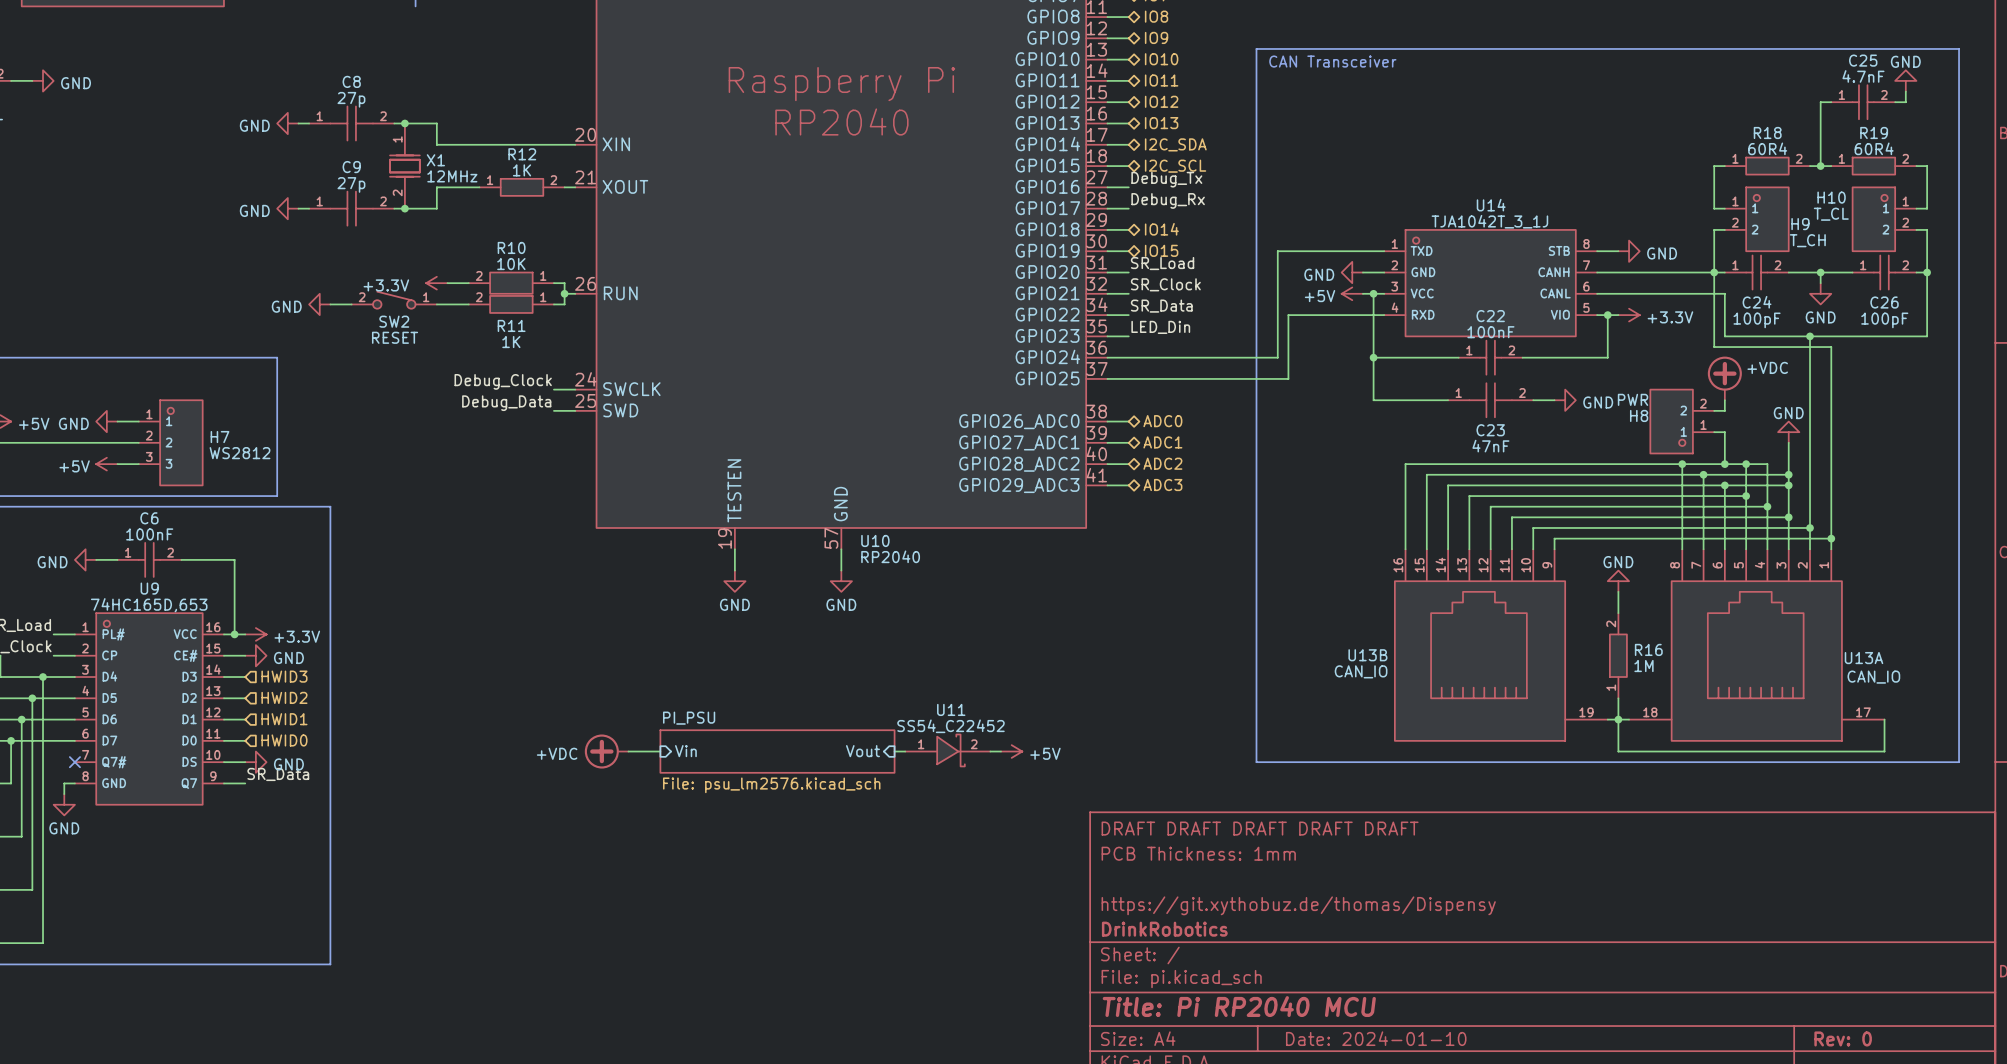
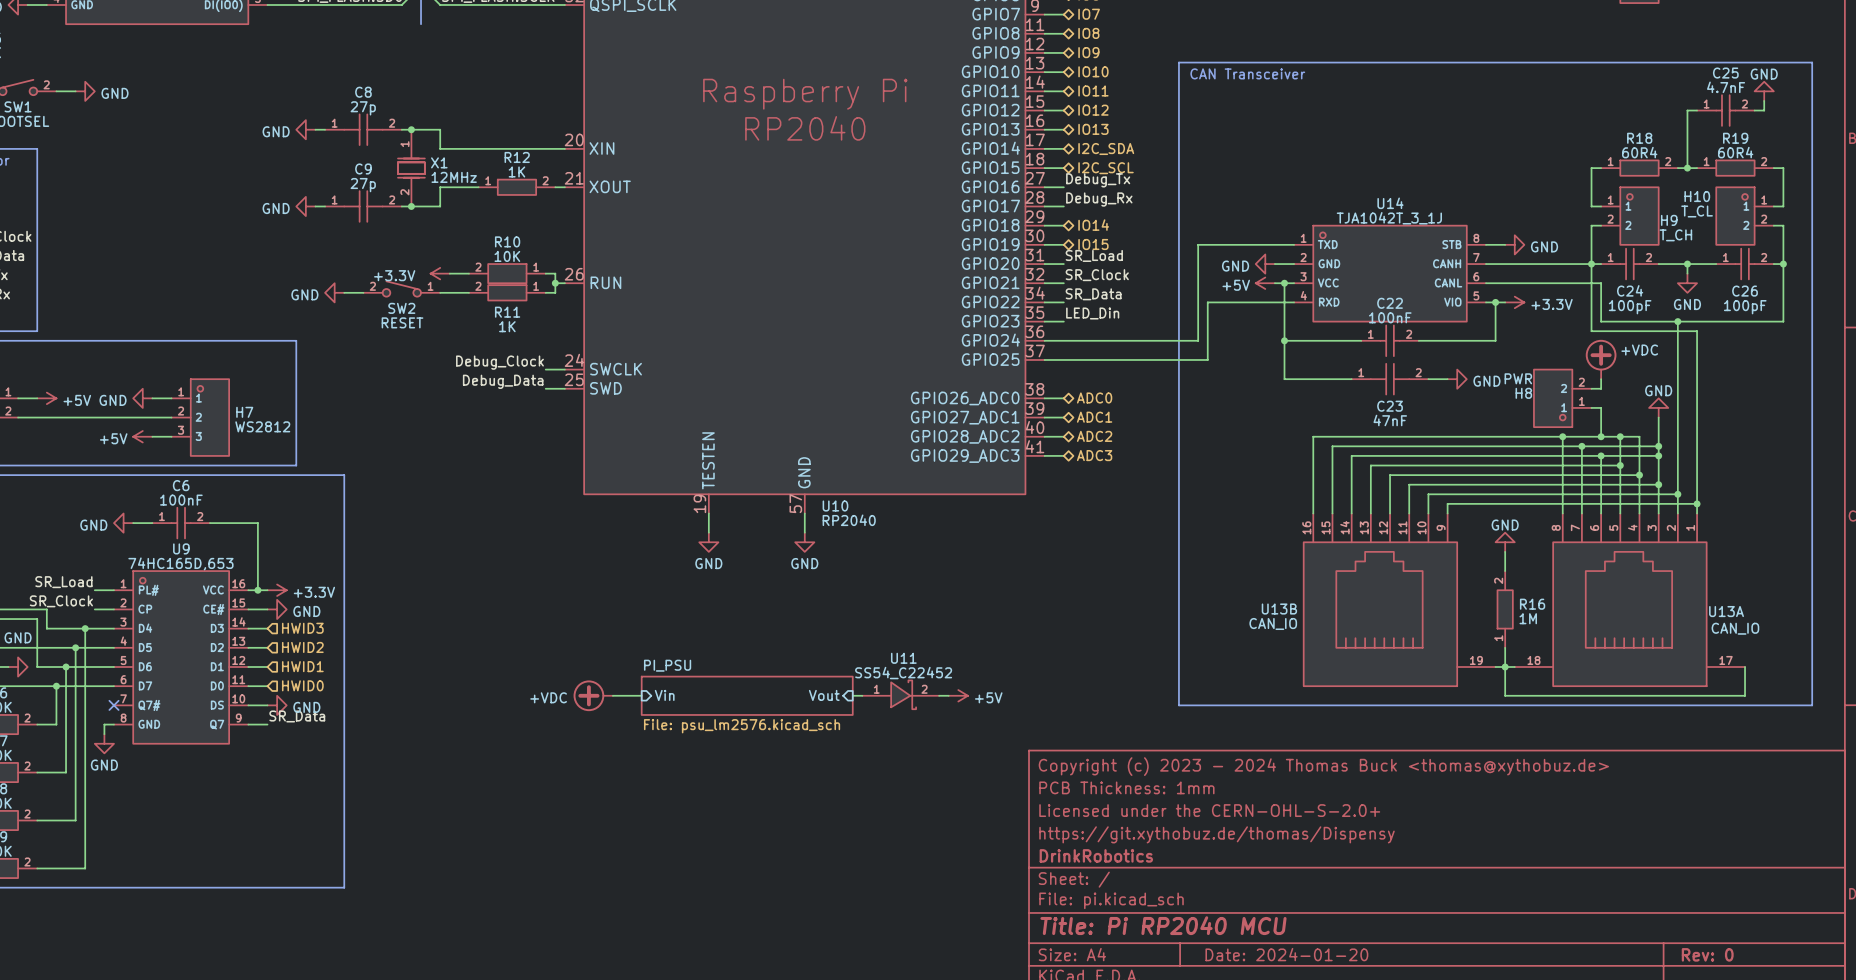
title block: DRAFT DRAFT DRAFT DRAFT DRAFT (1260, 828) -> Copyright (c) 2023 - 2024 Thomas Buck <thomas@xythobuz.de> (1323, 766)
title block: none -> Licensed under the CERN-OHL-S-2.0+ (1209, 810)
title block: Date: 2024-01-10 (1376, 1038) -> Date: 2024-01-20 (1286, 954)

